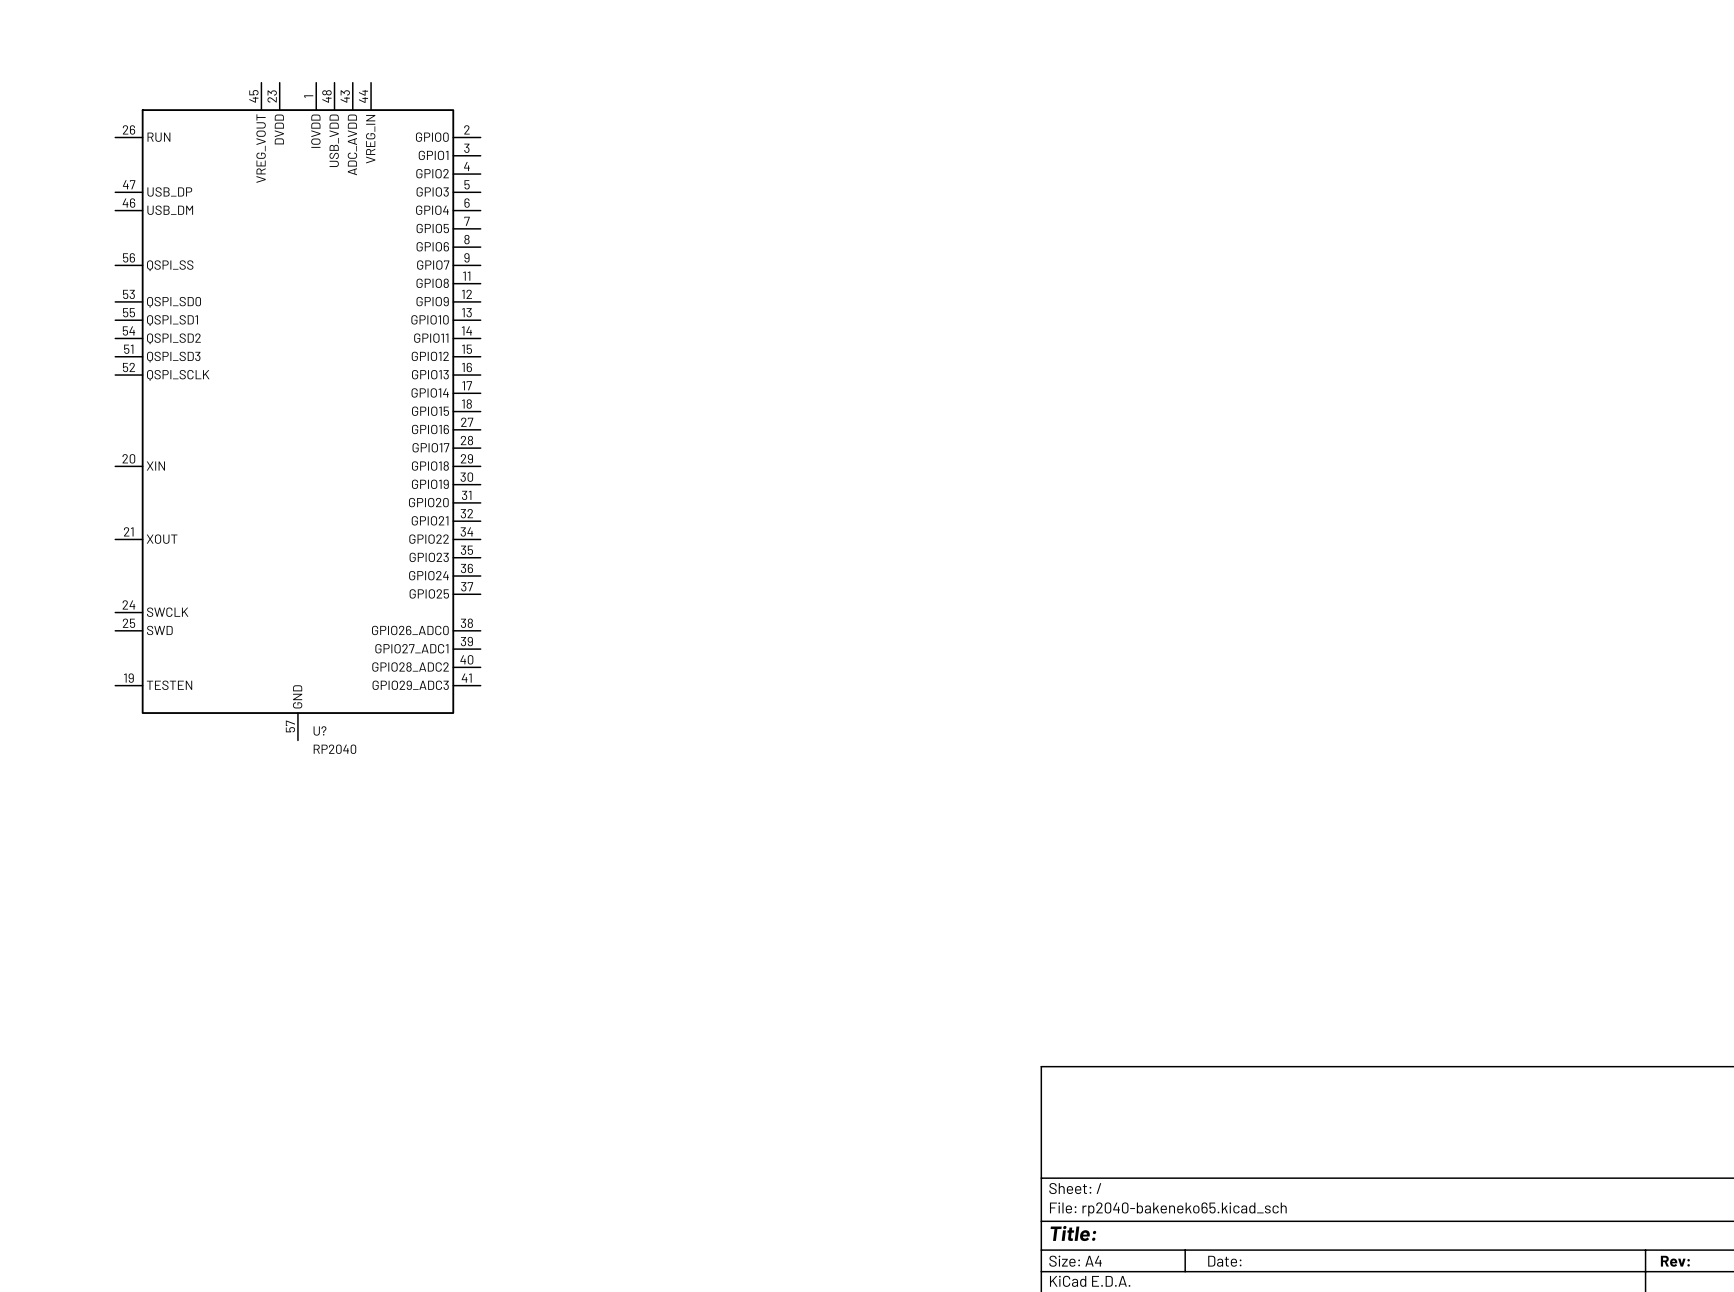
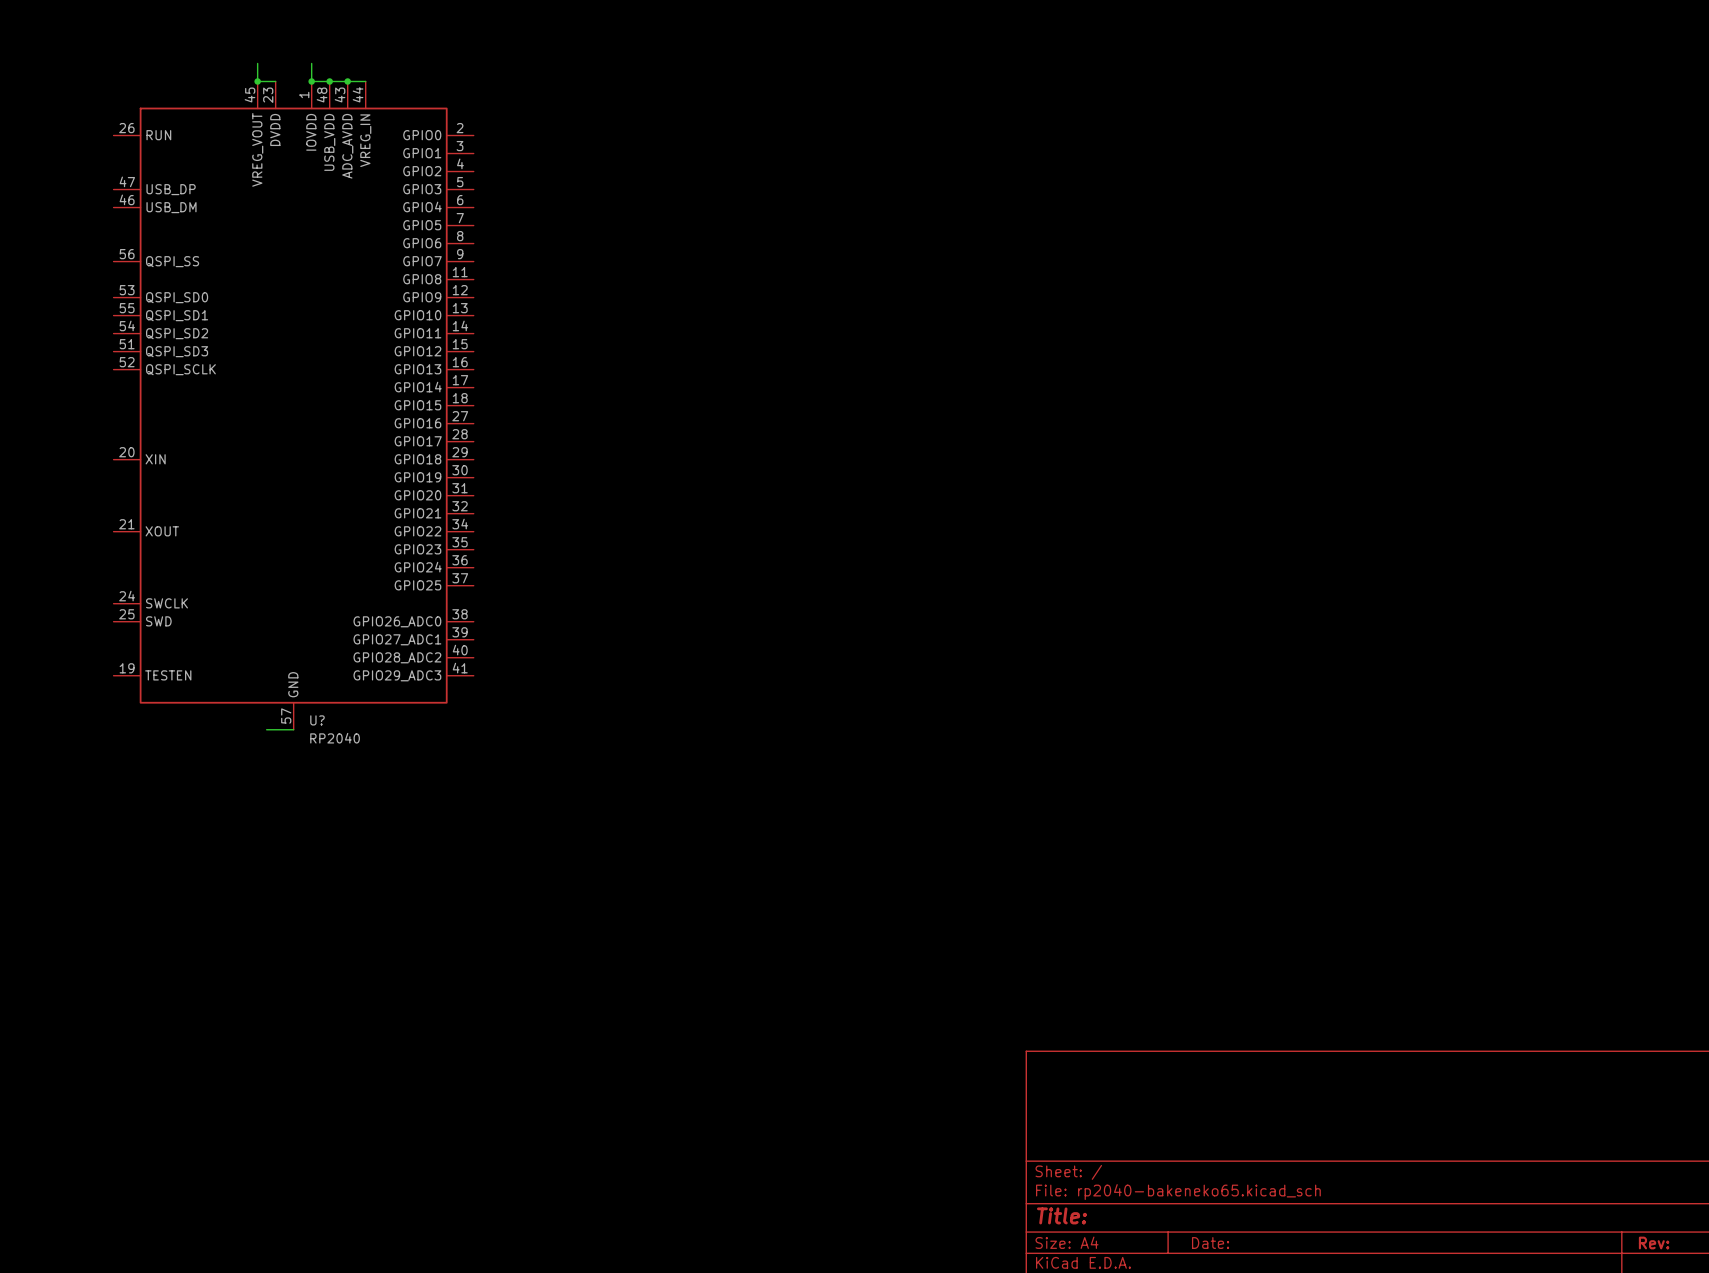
wire: none -> (257, 63) (257, 81) (275, 81)
wire: none -> (311, 63) (311, 81) (365, 81)
junction: none -> (257, 81)
junction: none -> (311, 81)
junction: none -> (329, 81)
junction: none -> (347, 81)
wire: none -> (266, 729) (293, 729)

